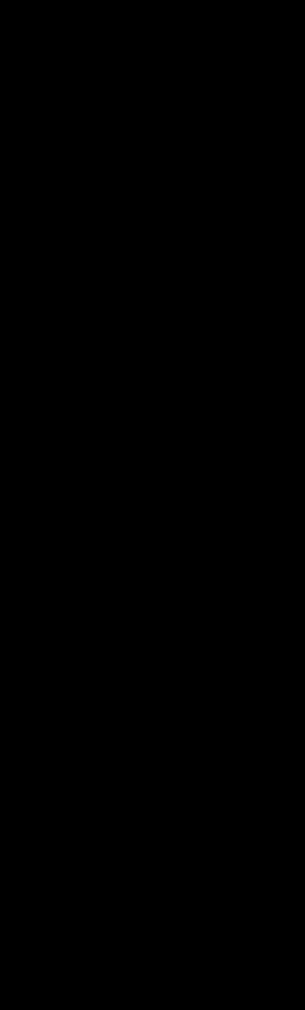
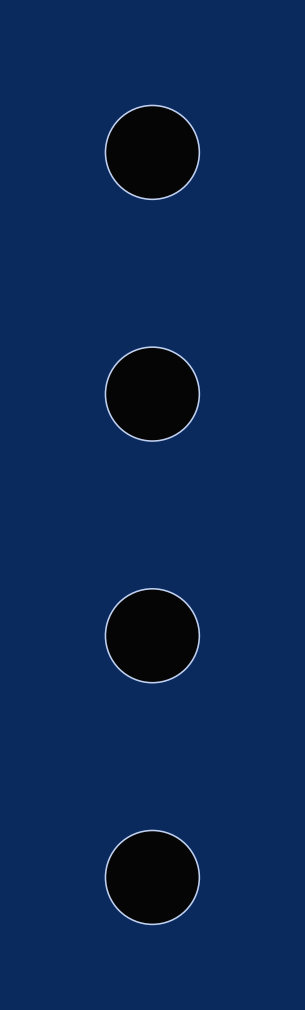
part: none -> (152, 152)
part: none -> (152, 394)
part: none -> (152, 635)
part: none -> (152, 877)

